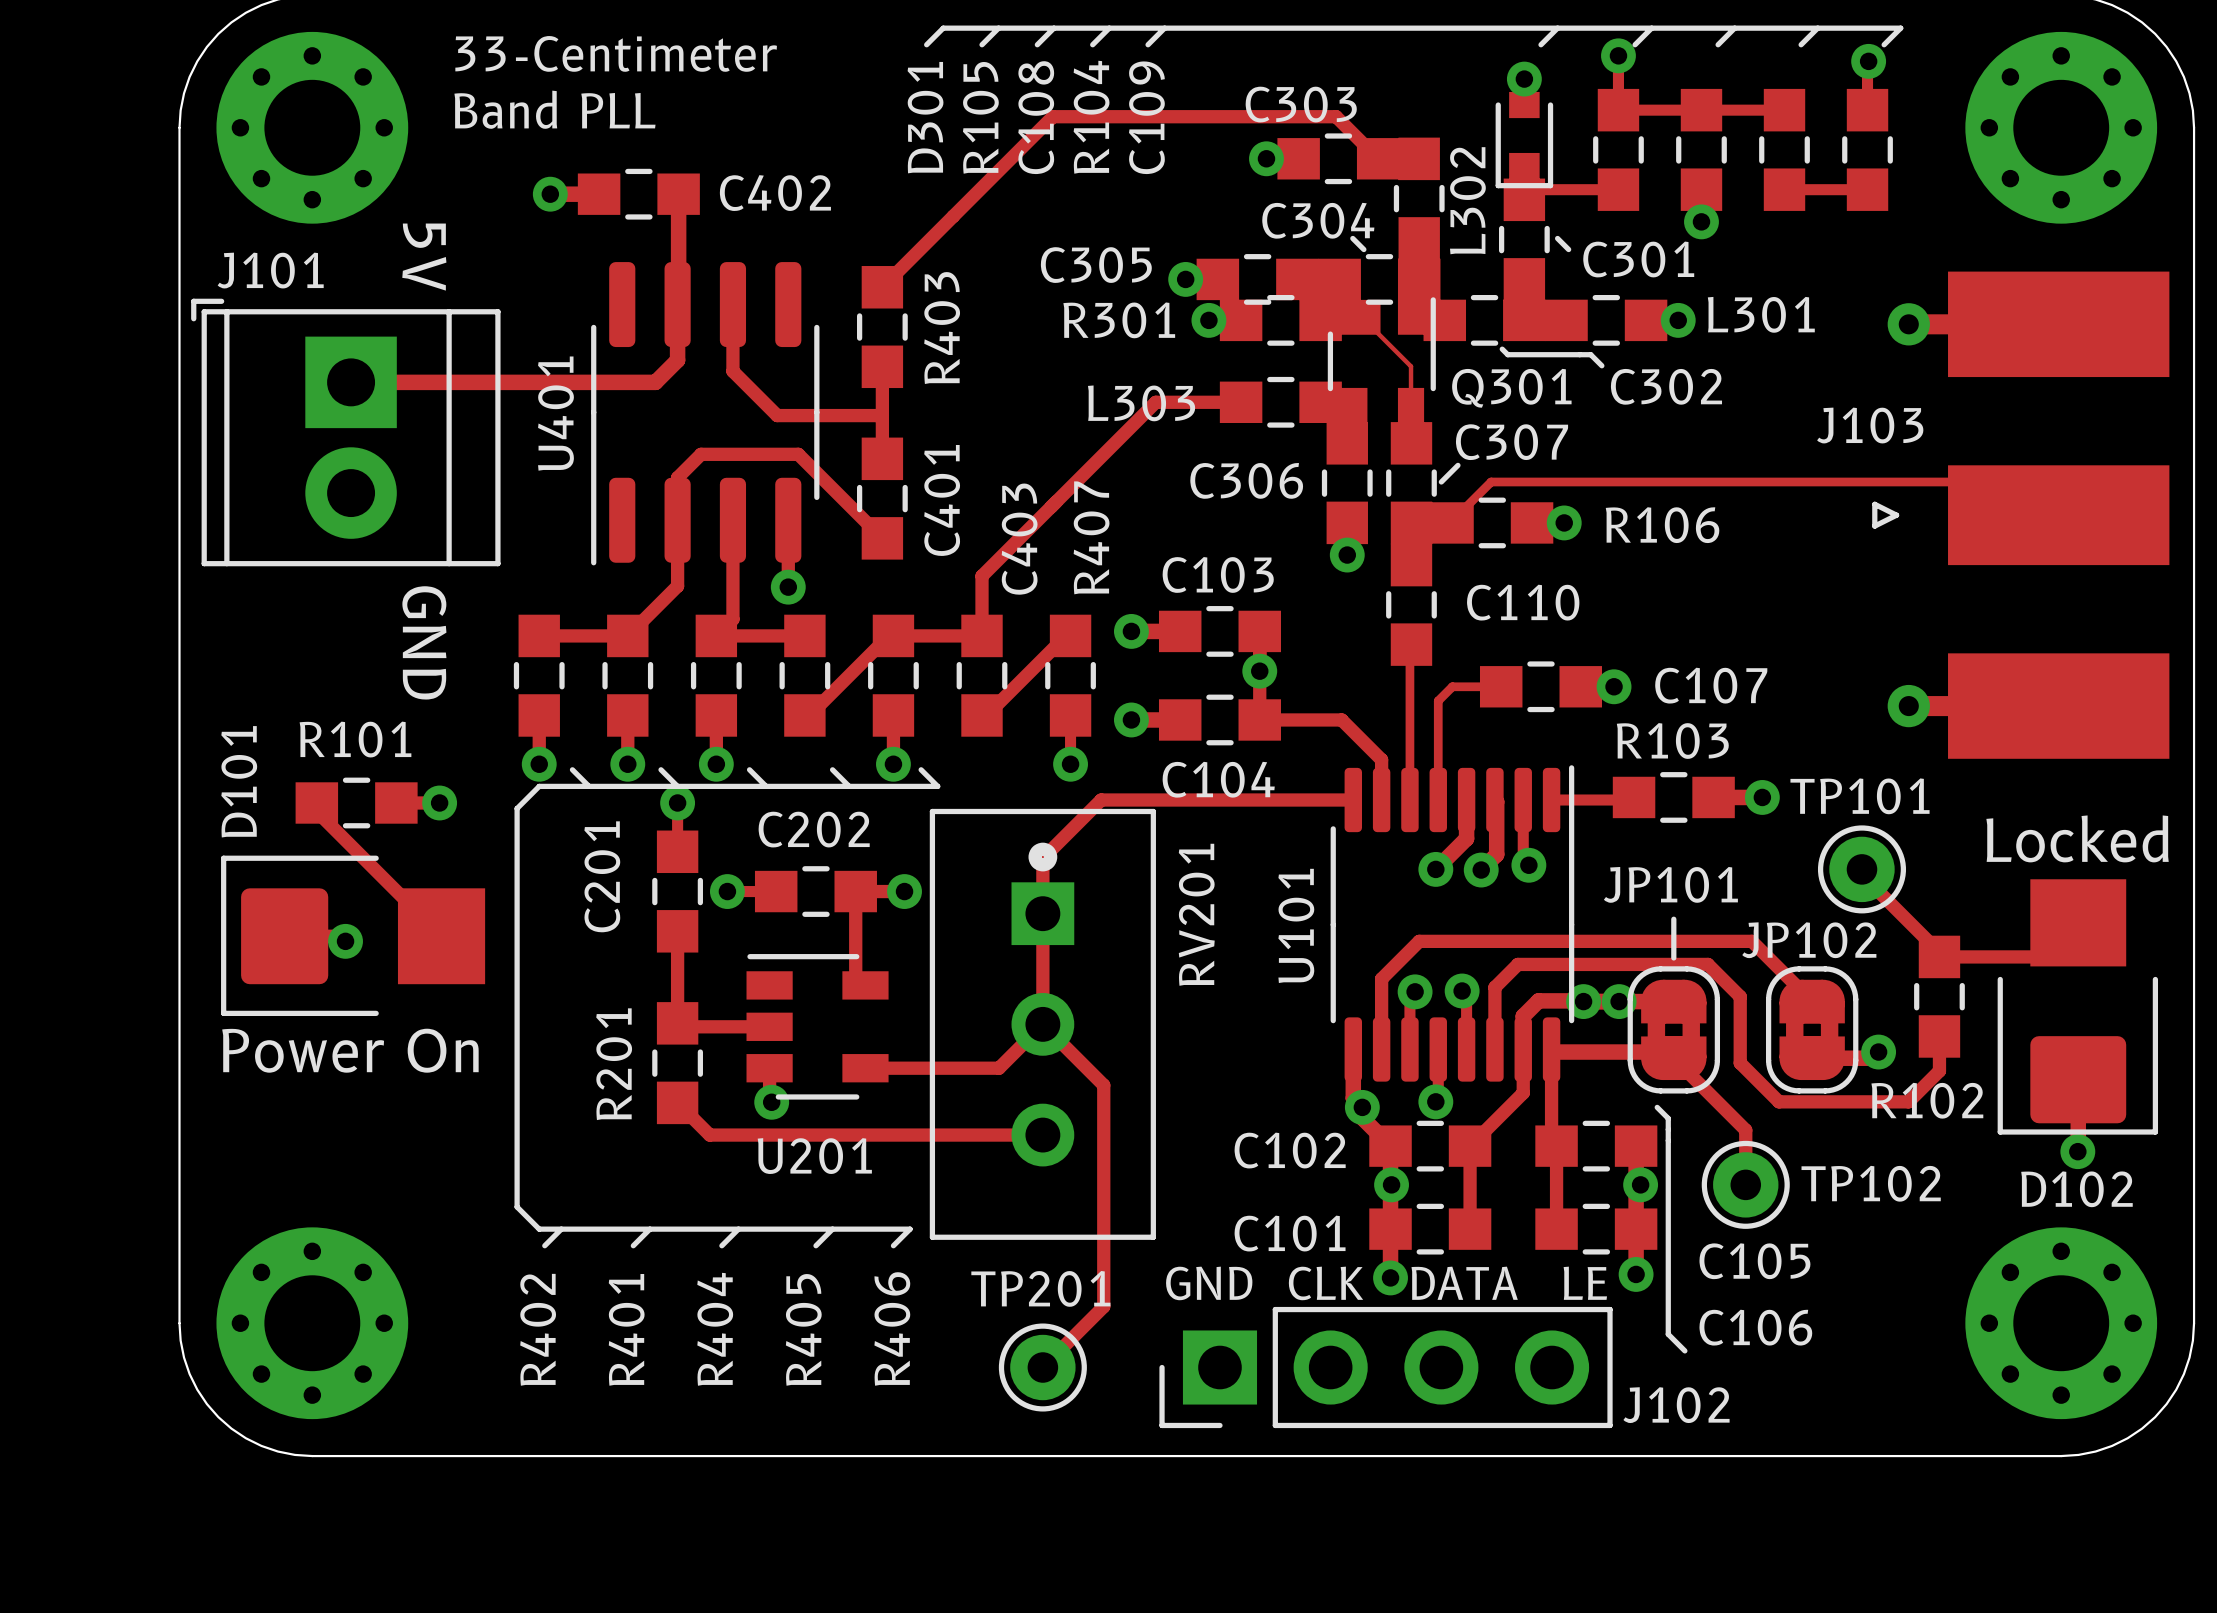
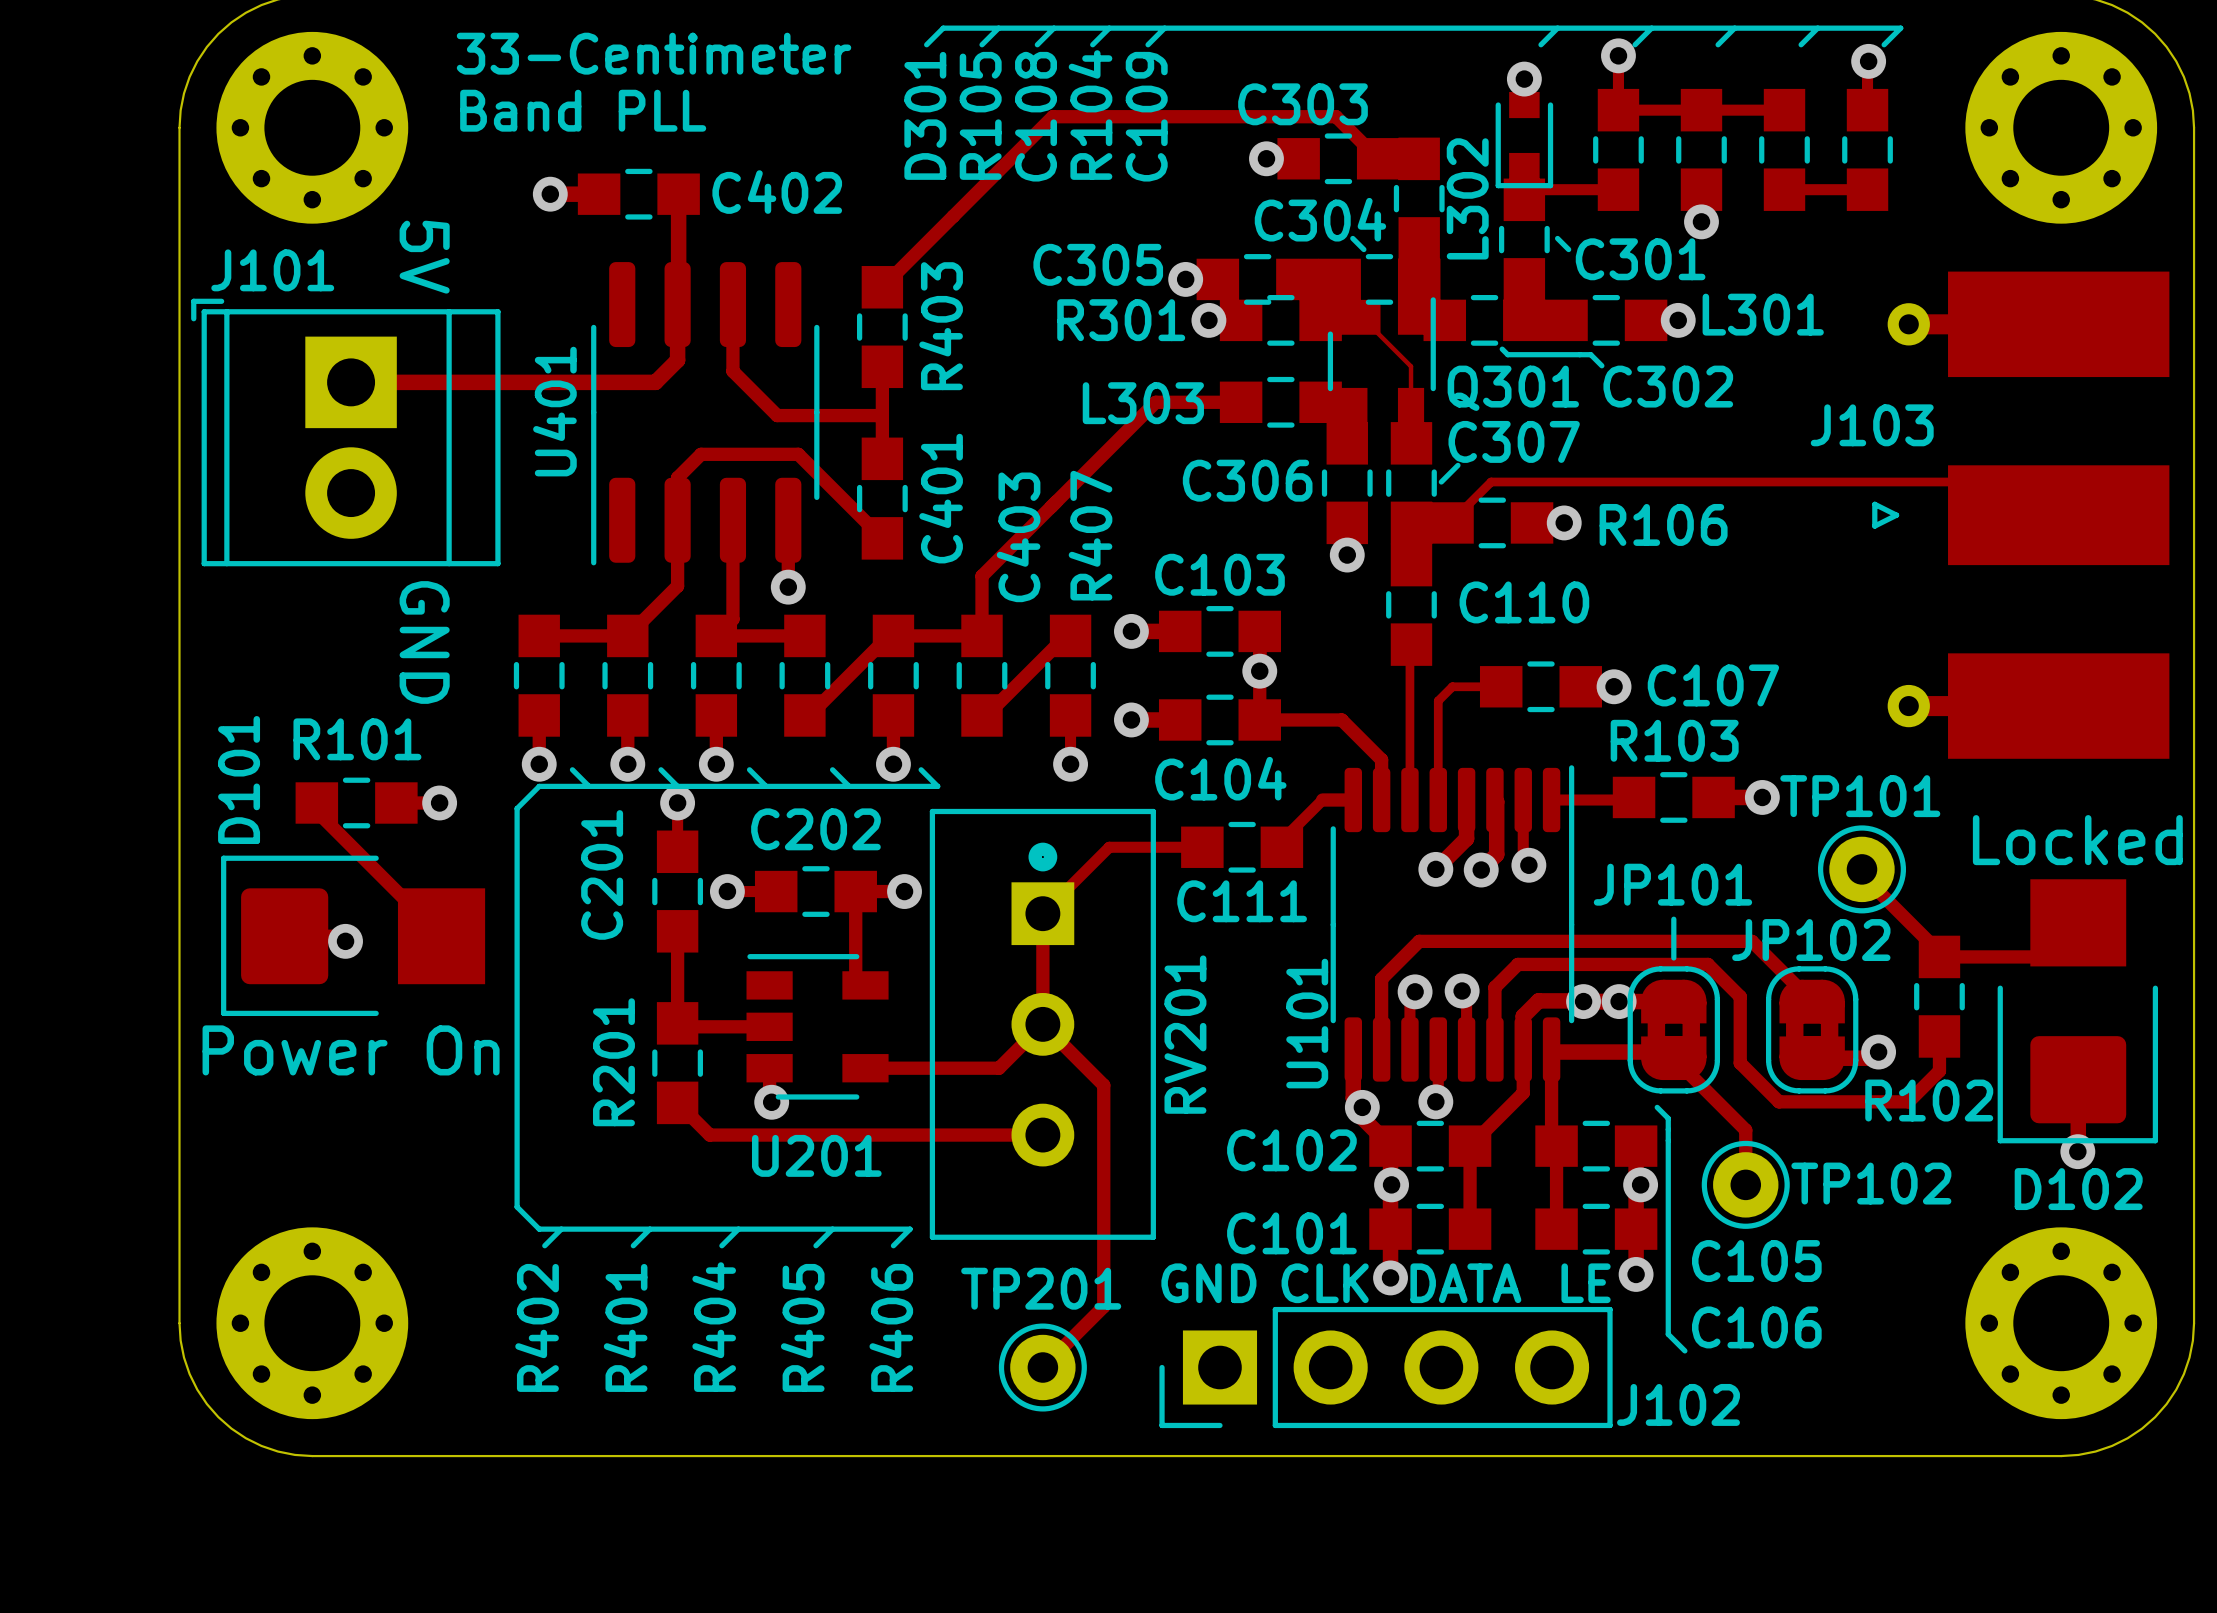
track: (1322, 800) (1101, 800) (1042, 858) (1042, 913) -> (1202, 847) (1109, 847) (1042, 913)
track: none -> (1322, 800) (1281, 840) (1281, 847)
C111: none -> (1242, 847)
D102 footprint: [1997, 879, 2159, 1135] -> [1997, 879, 2159, 1144]
RV201 name position: RV201 (1196, 914) -> RV201 (1185, 1034)
U101 name position: U101 (1296, 925) -> U101 (1307, 1023)

